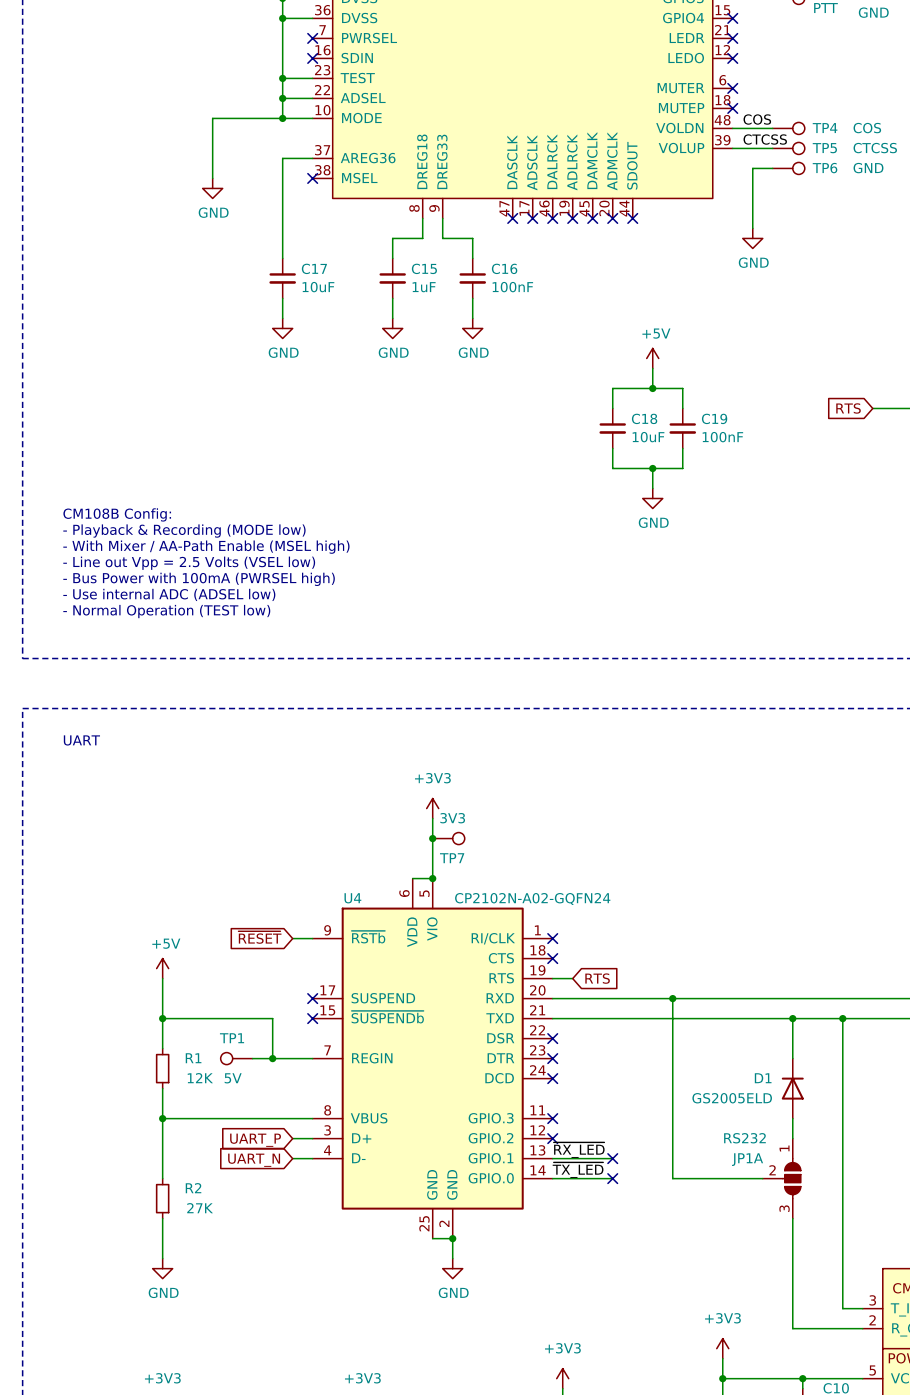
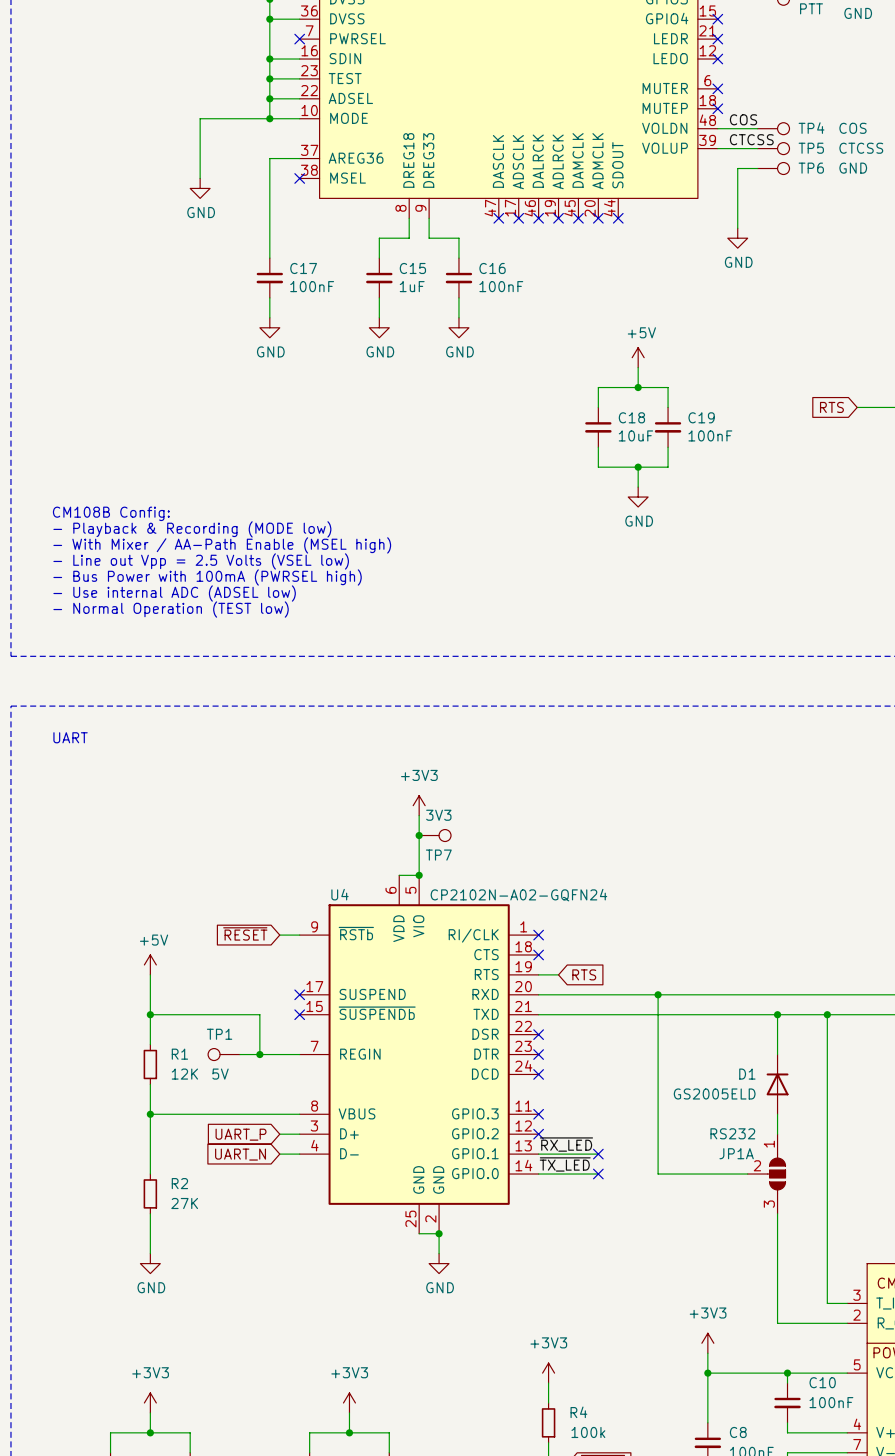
wire: none -> (269, 59) (299, 59)
junction: none -> (269, 59)
no-connect mark: (312, 58) -> none
C17 value: 10uF (318, 287) -> 100nF (312, 286)

